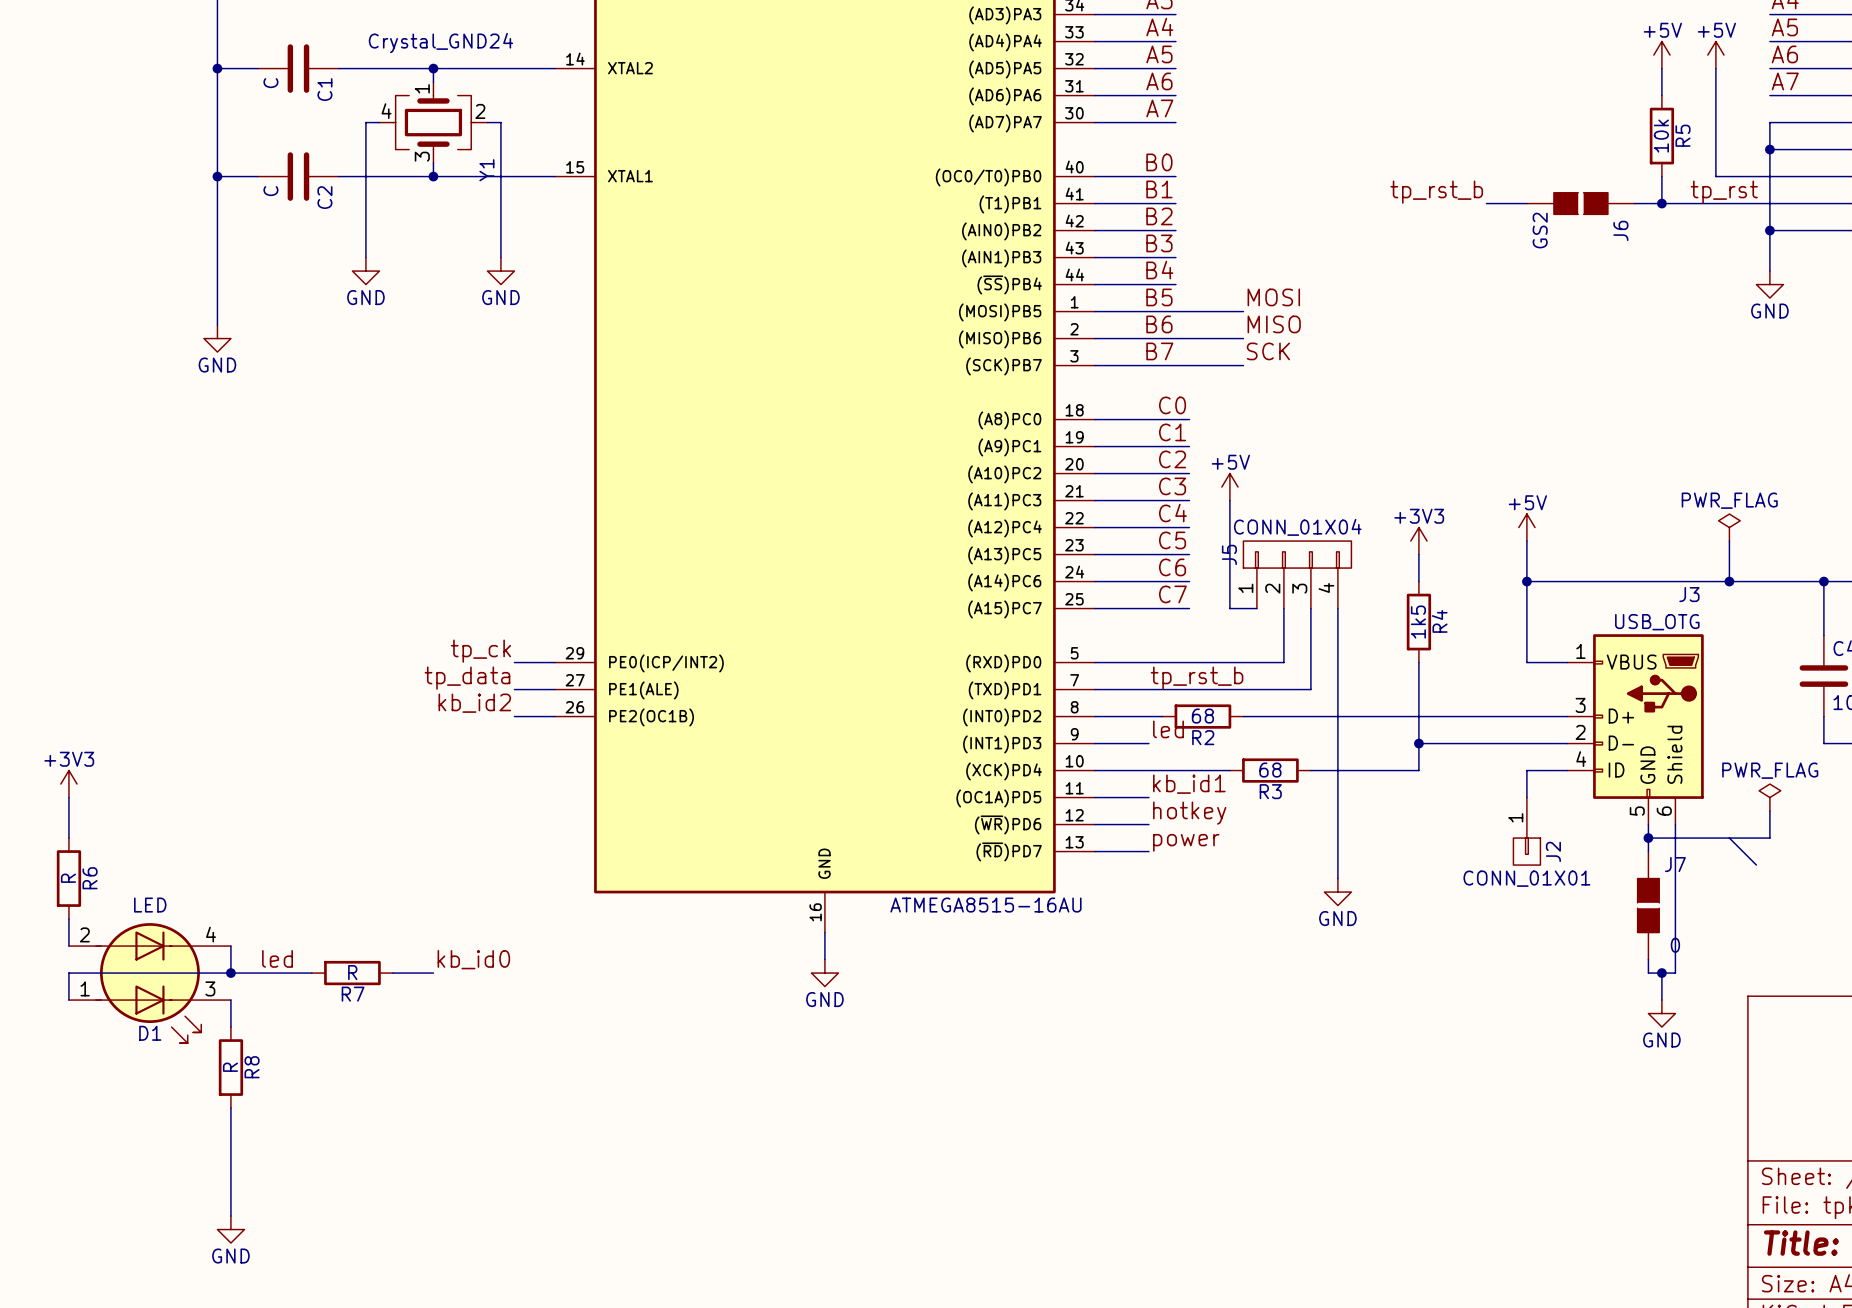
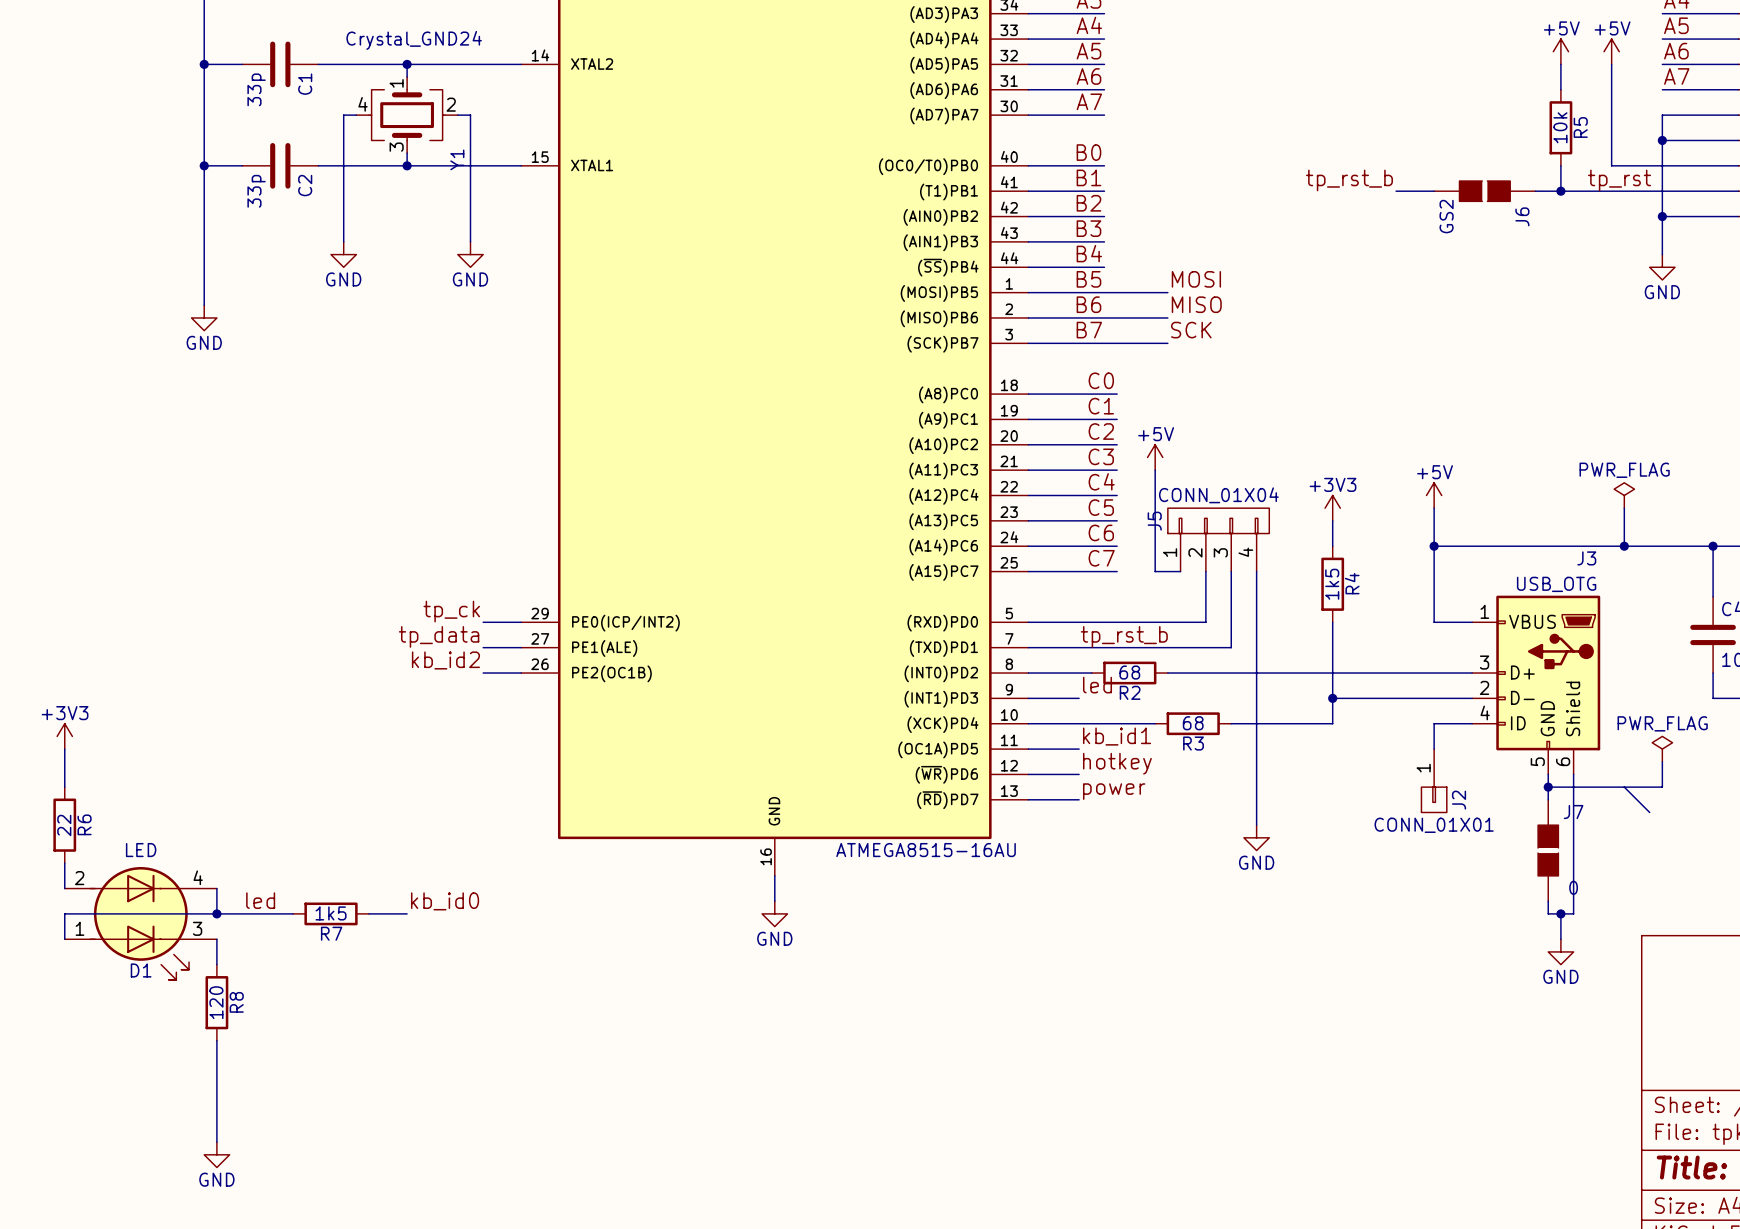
C1 value: C (270, 83) -> 33p (256, 89)
C2 value: C (270, 191) -> 33p (256, 191)
R6 value: R (68, 878) -> 22 (64, 825)
R7 value: R (352, 972) -> 1k5 (331, 913)
R8 value: R (230, 1067) -> 120 (216, 1002)

